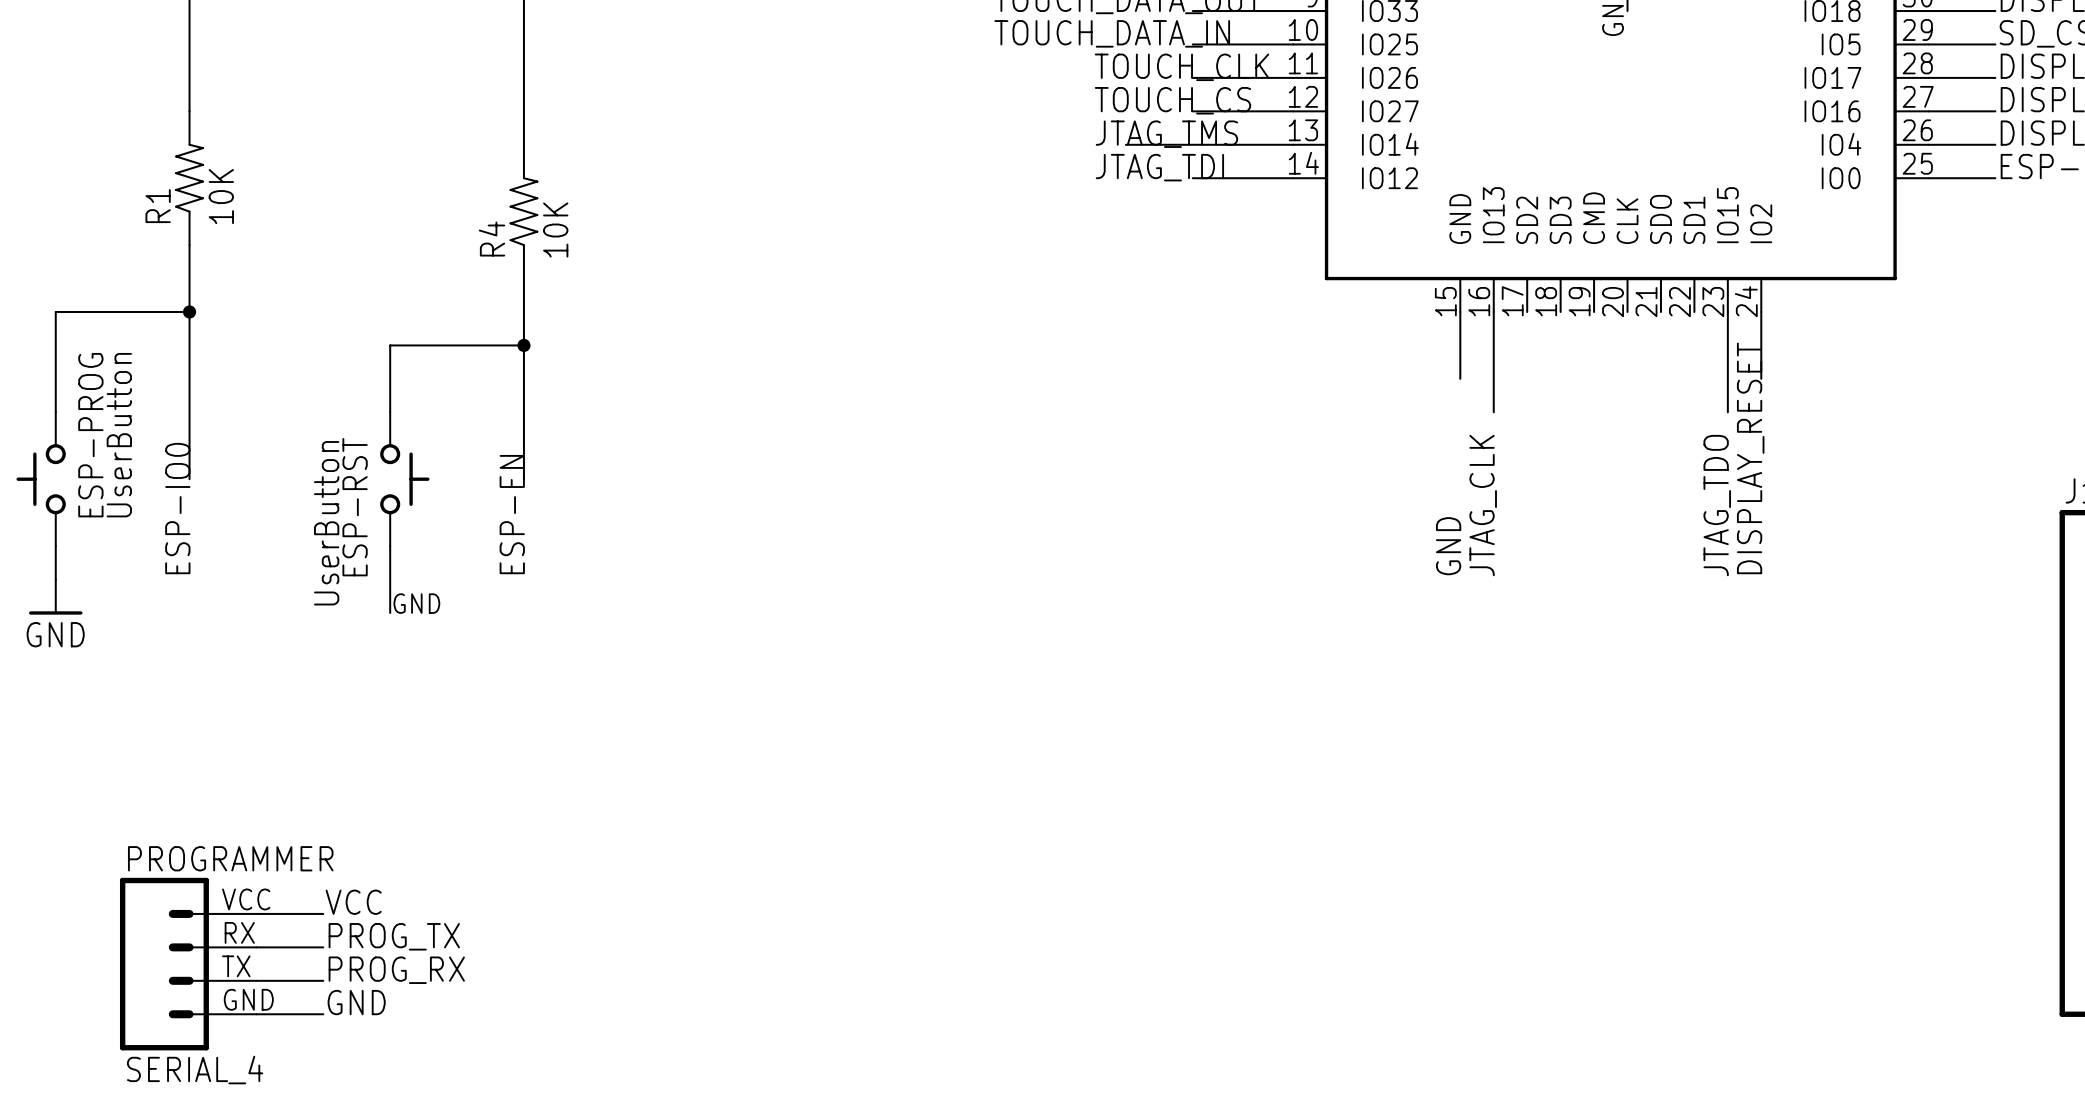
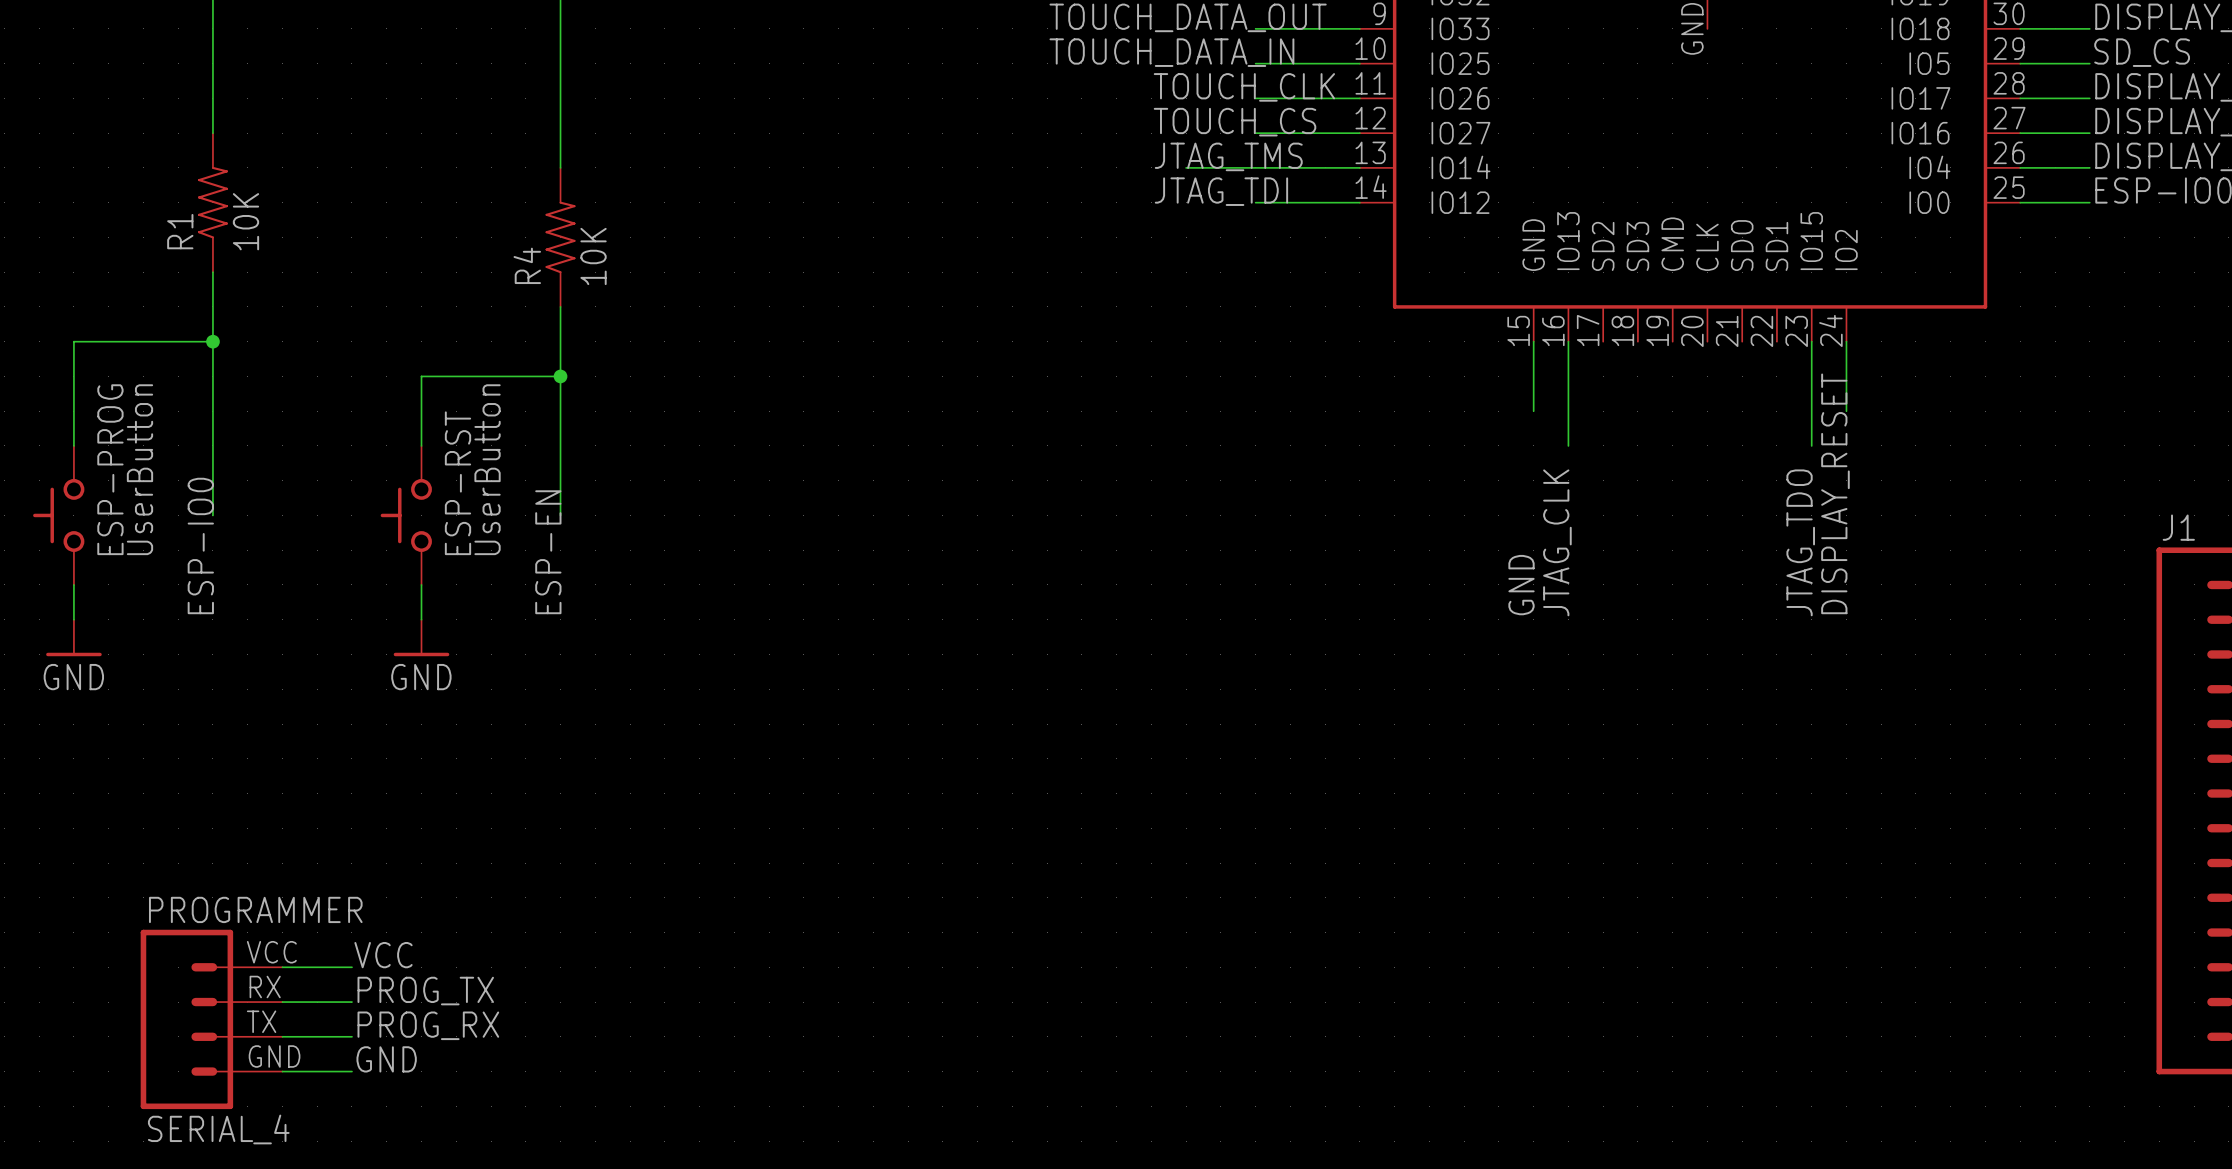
ESP-RST rotation: 0° (404, 479) -> 180° (406, 515)
power symbol: none -> GND (421, 637)
label: GND (416, 603) -> none

